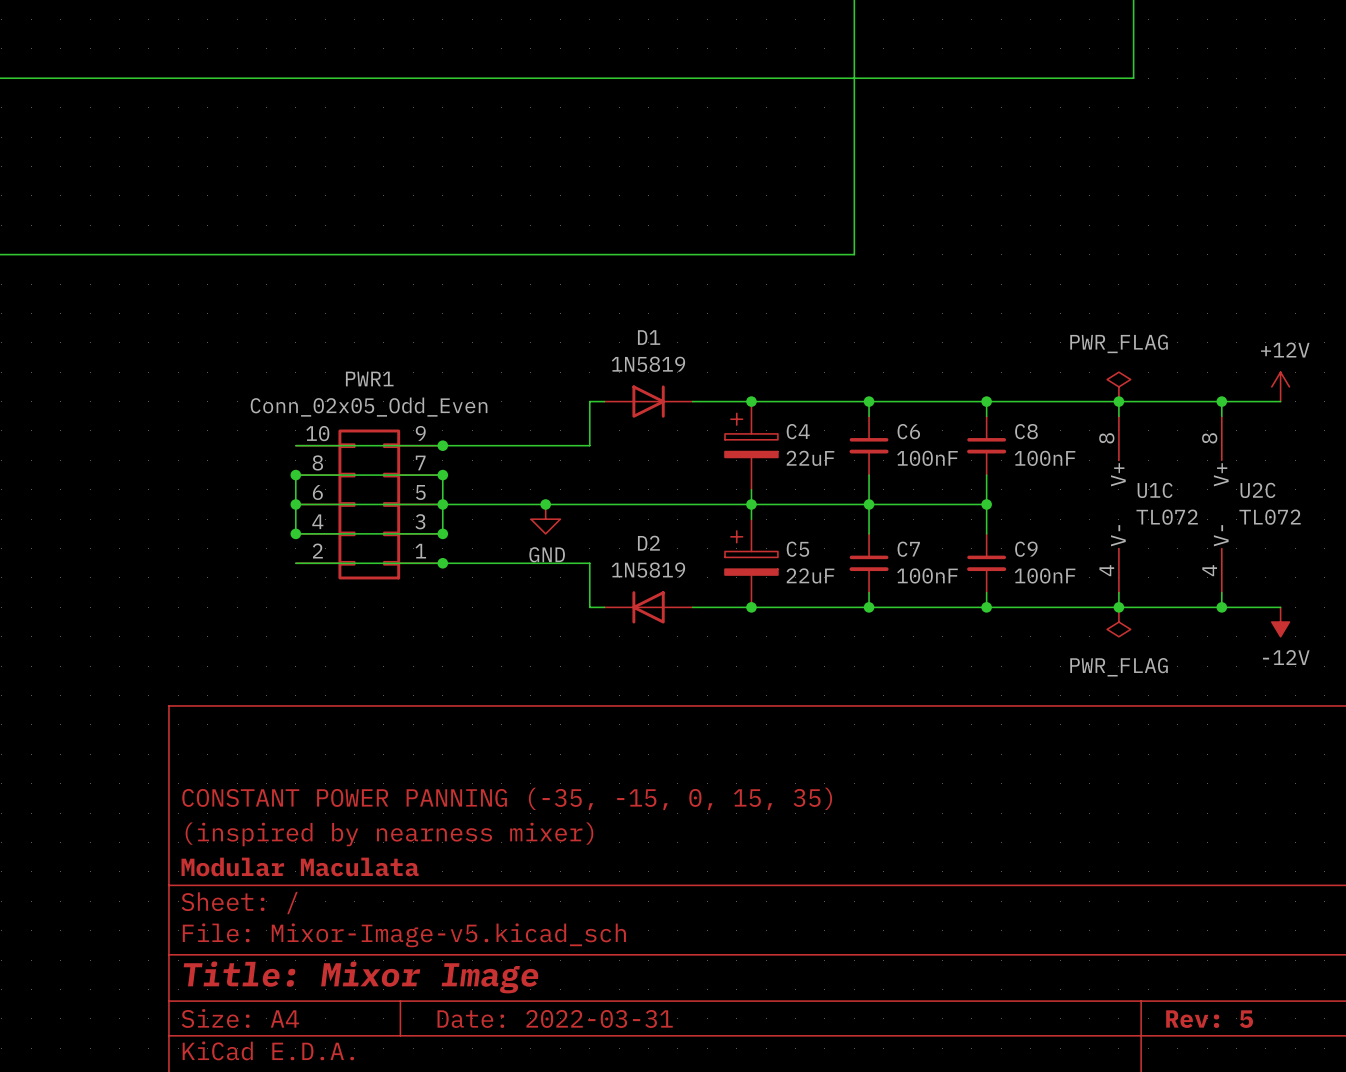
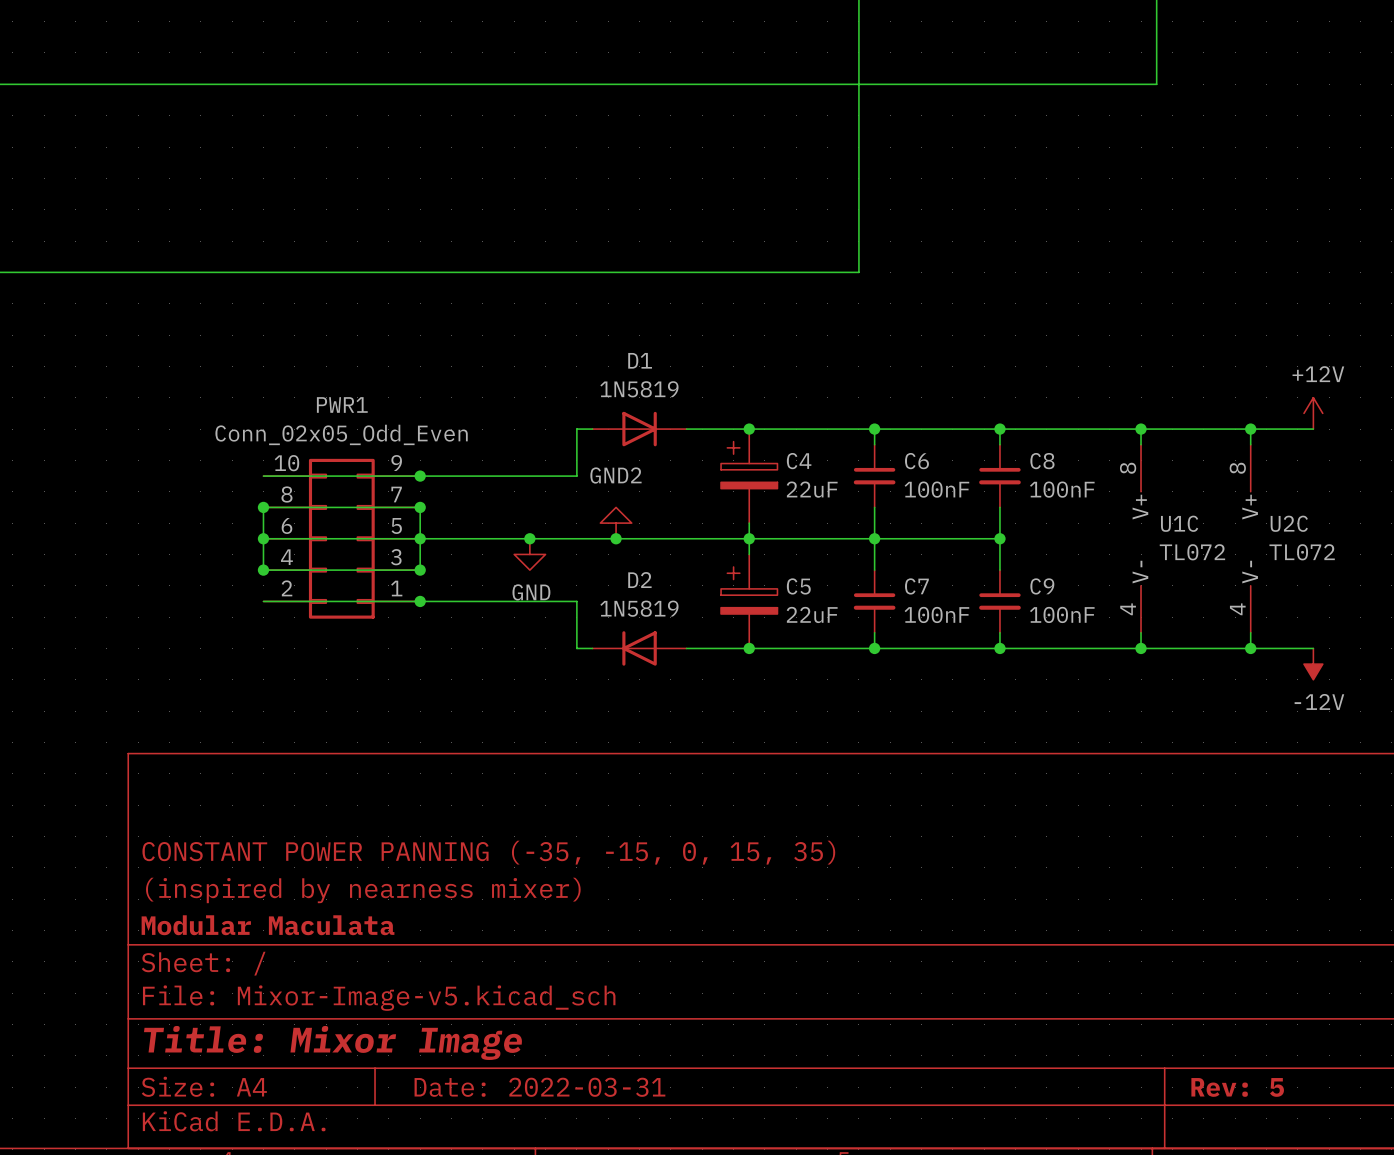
power symbol: PWR_FLAG (1118, 386) -> none
power symbol: none -> GND2 (616, 523)
junction: none -> (616, 538)
power symbol: PWR_FLAG (1118, 622) -> none

